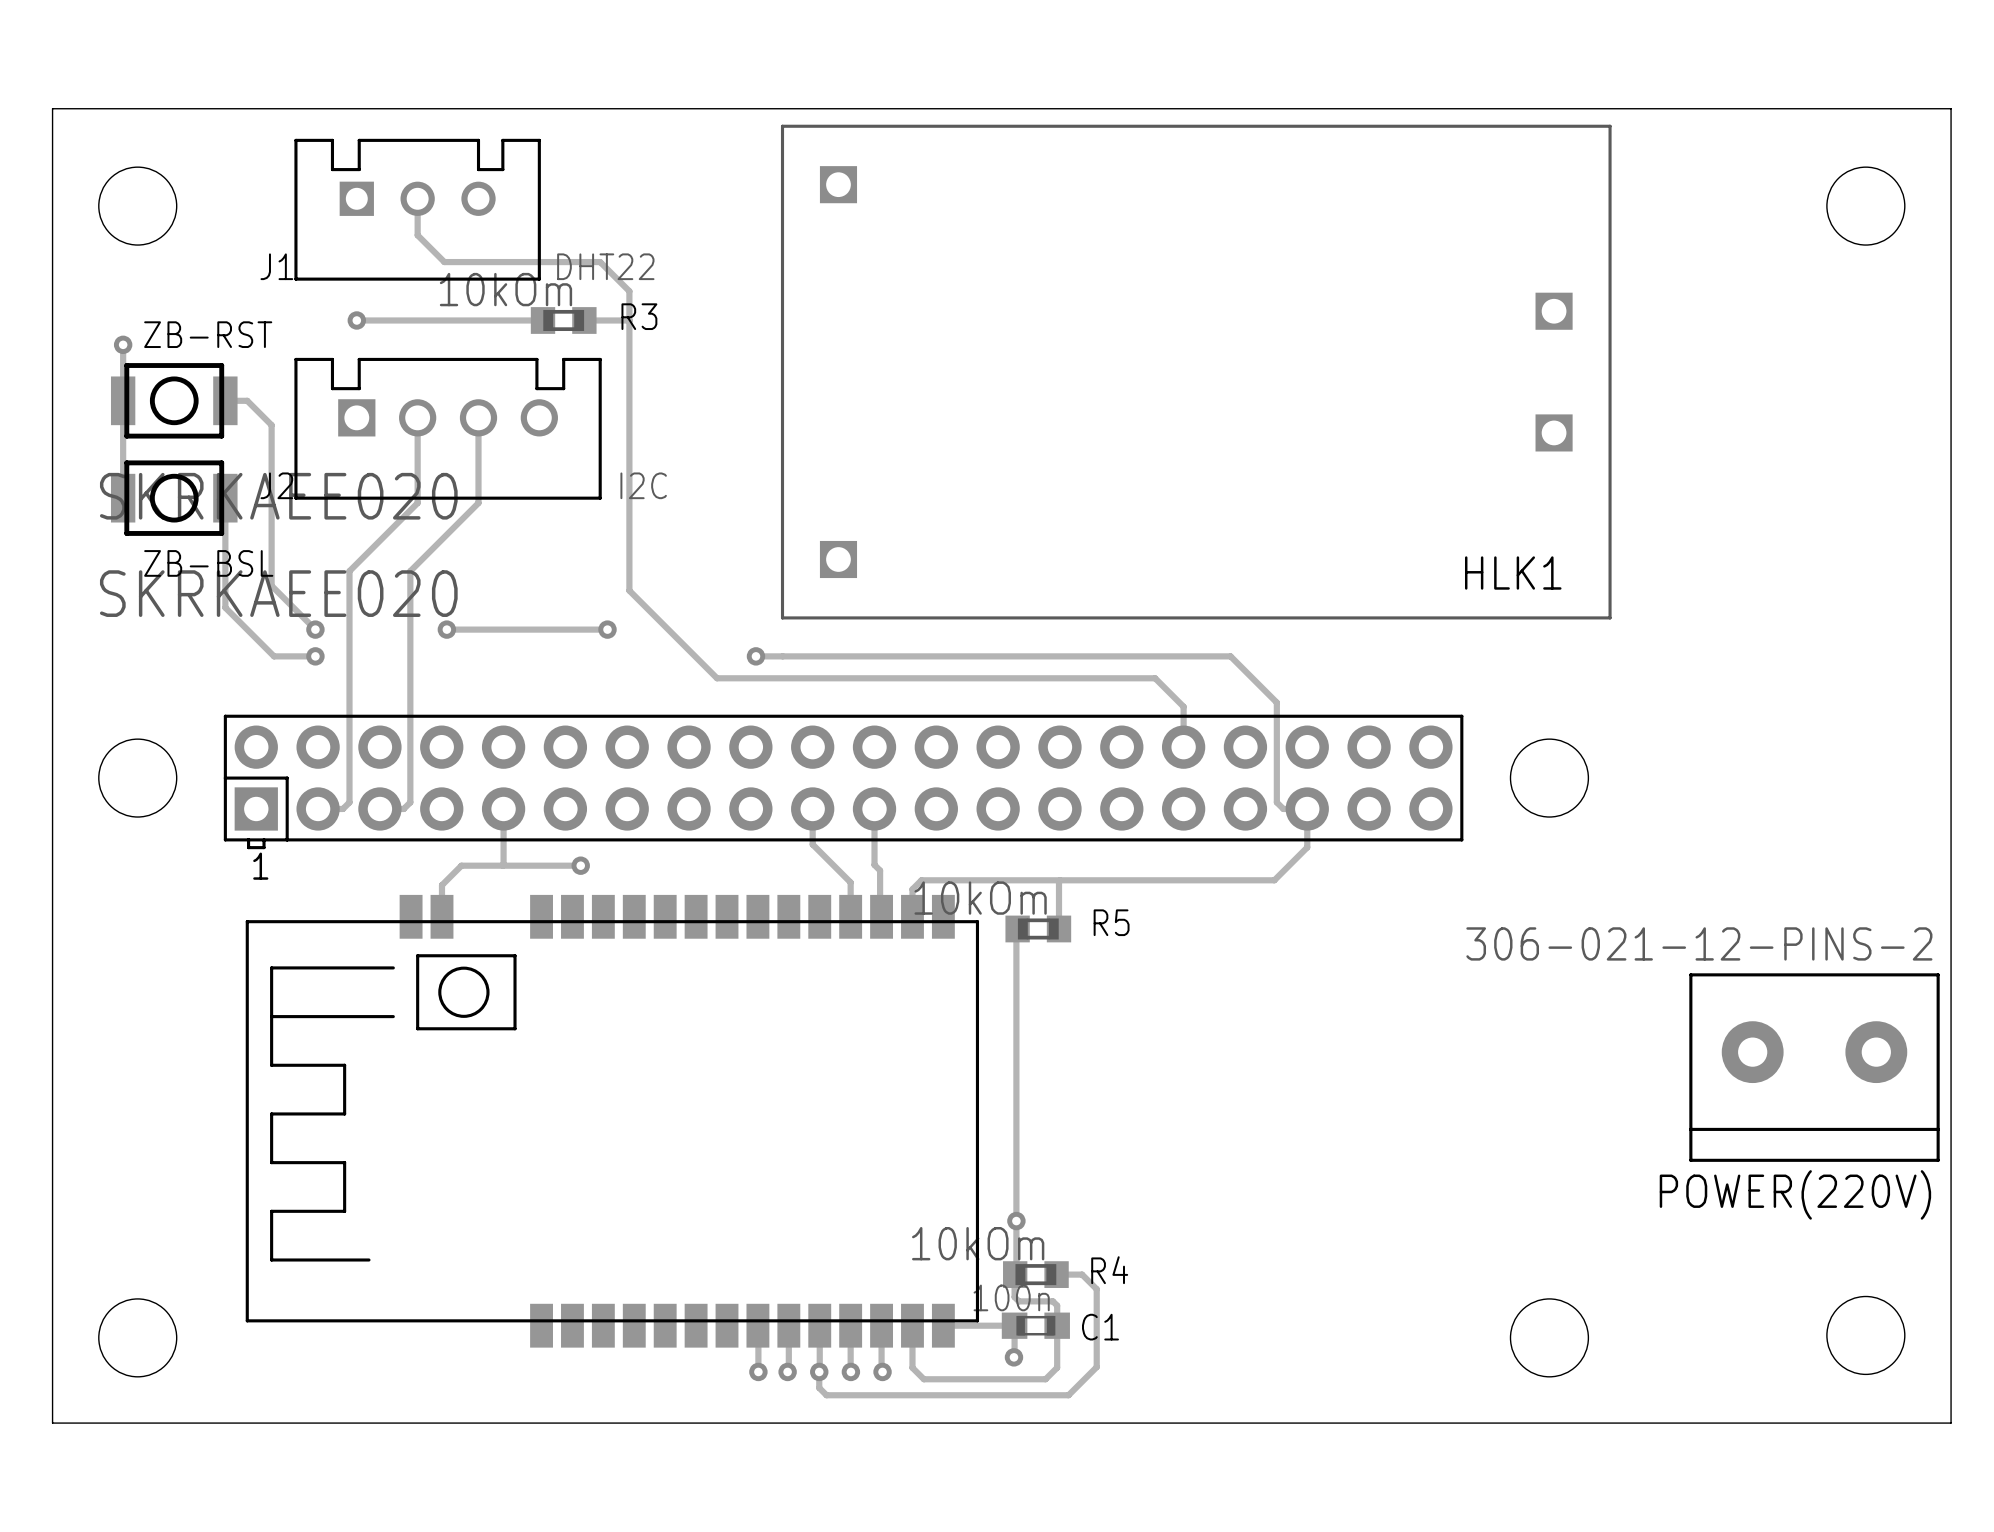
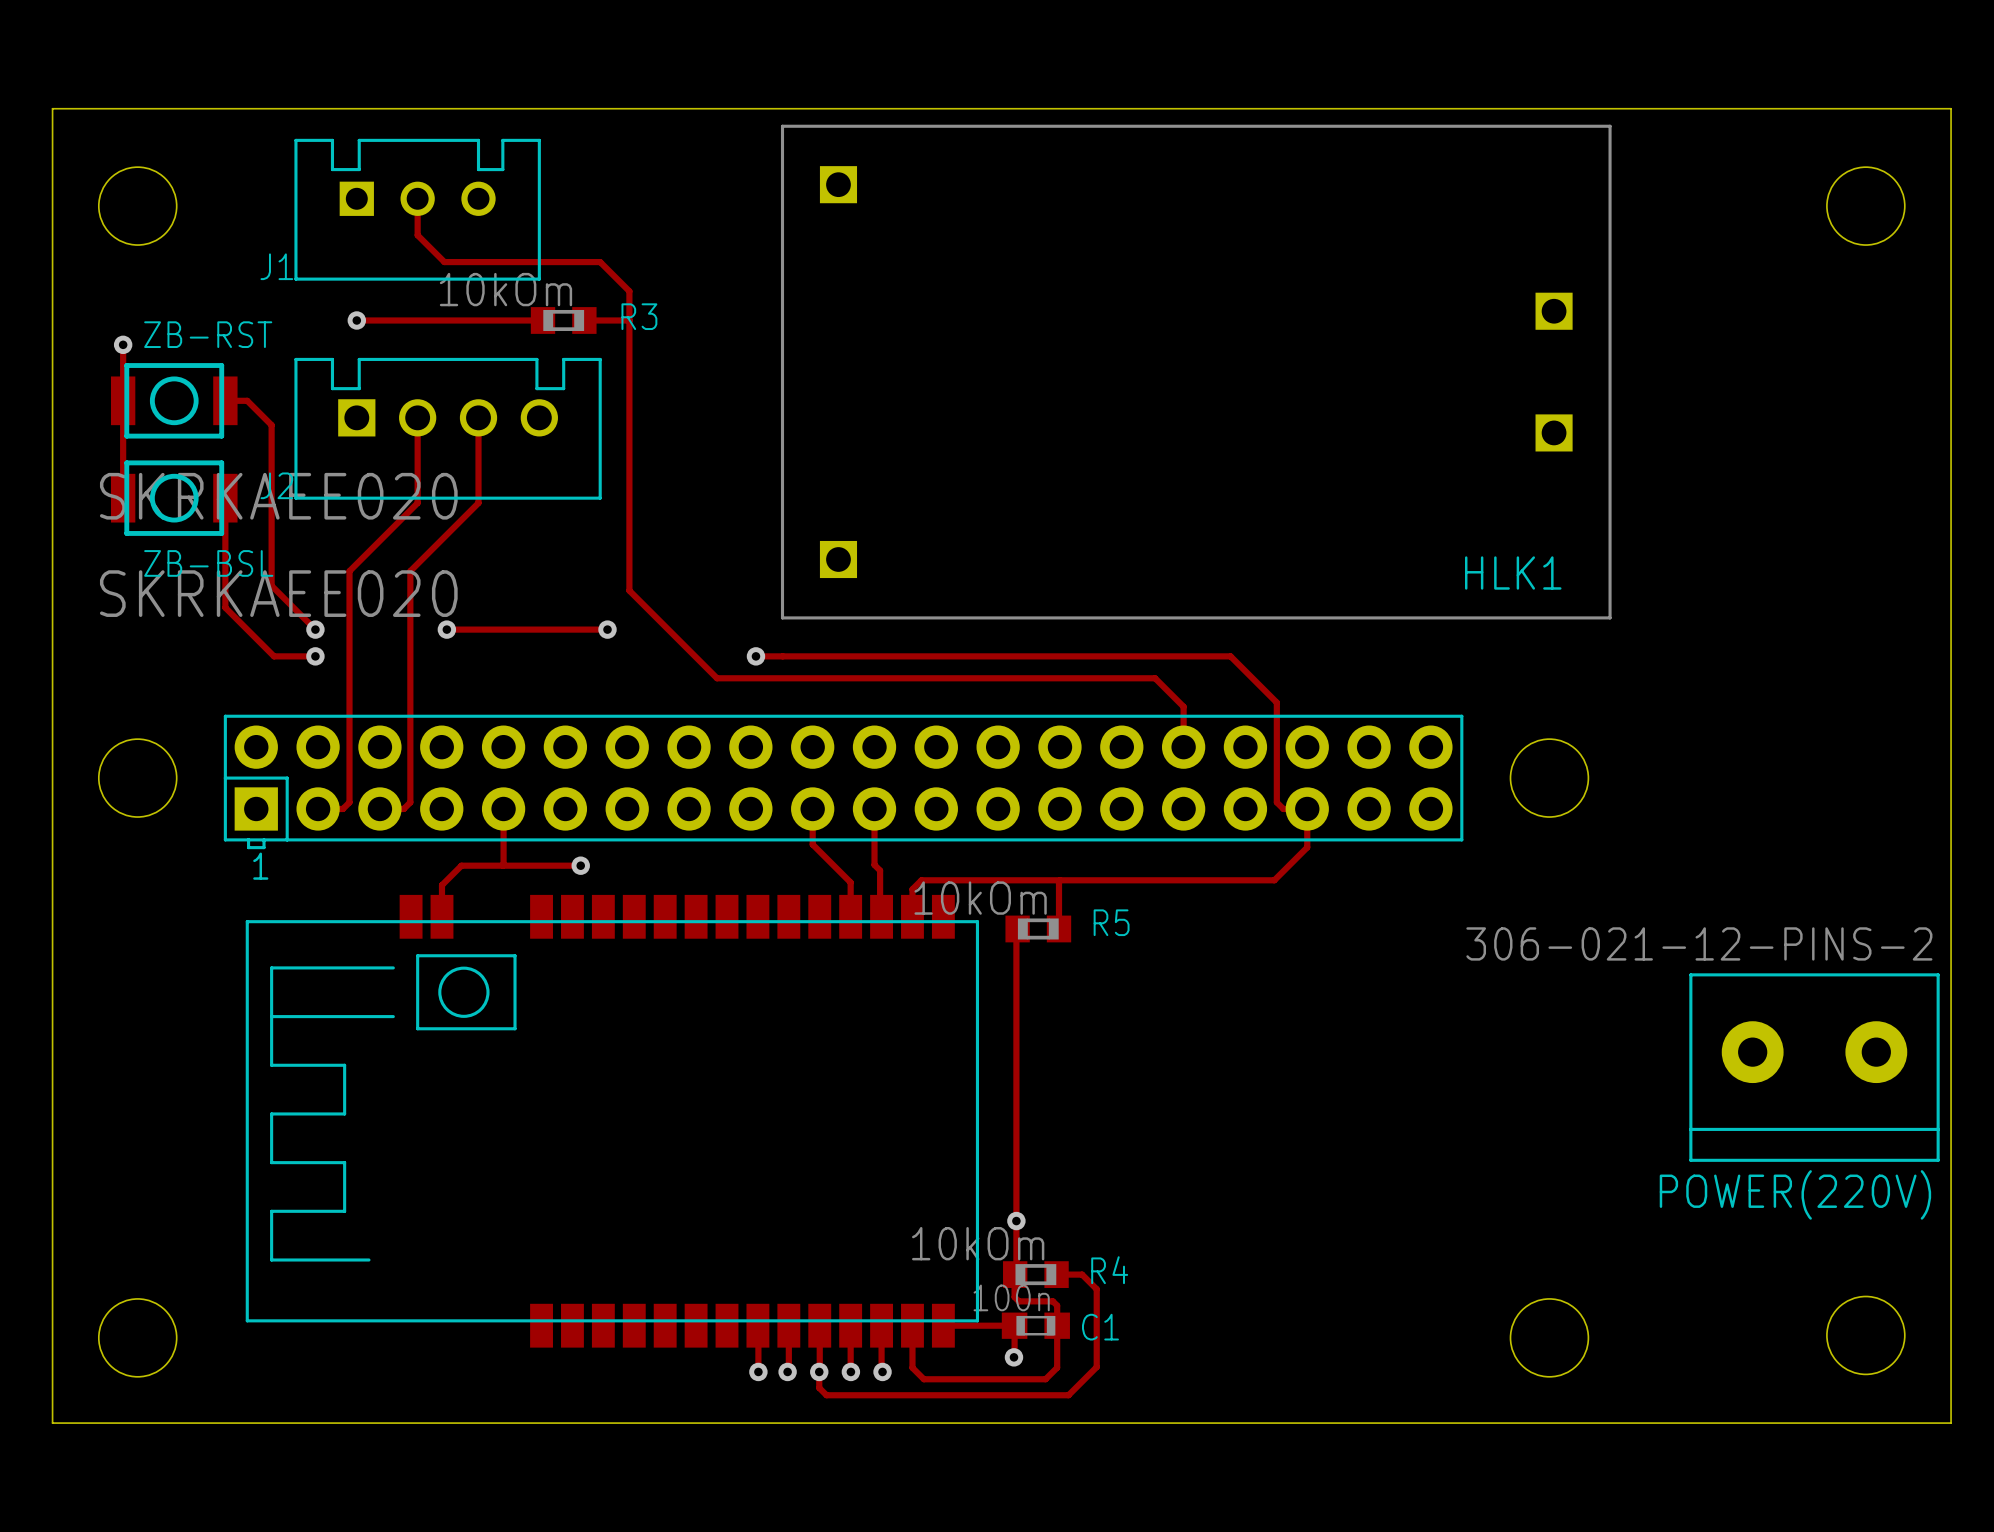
text: DHT22 (605, 266) -> none
text: I2C (643, 485) -> none

